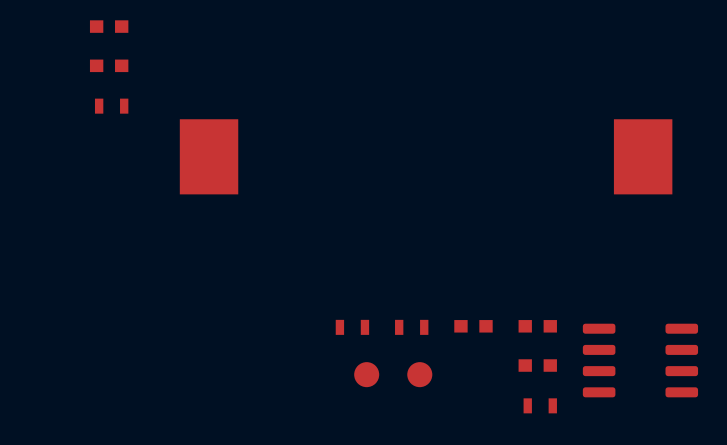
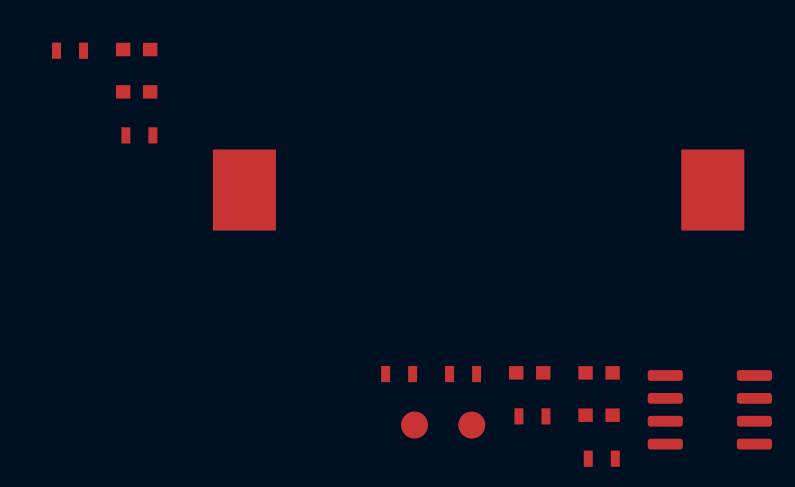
part: none -> (70, 50)
part: none -> (532, 416)

